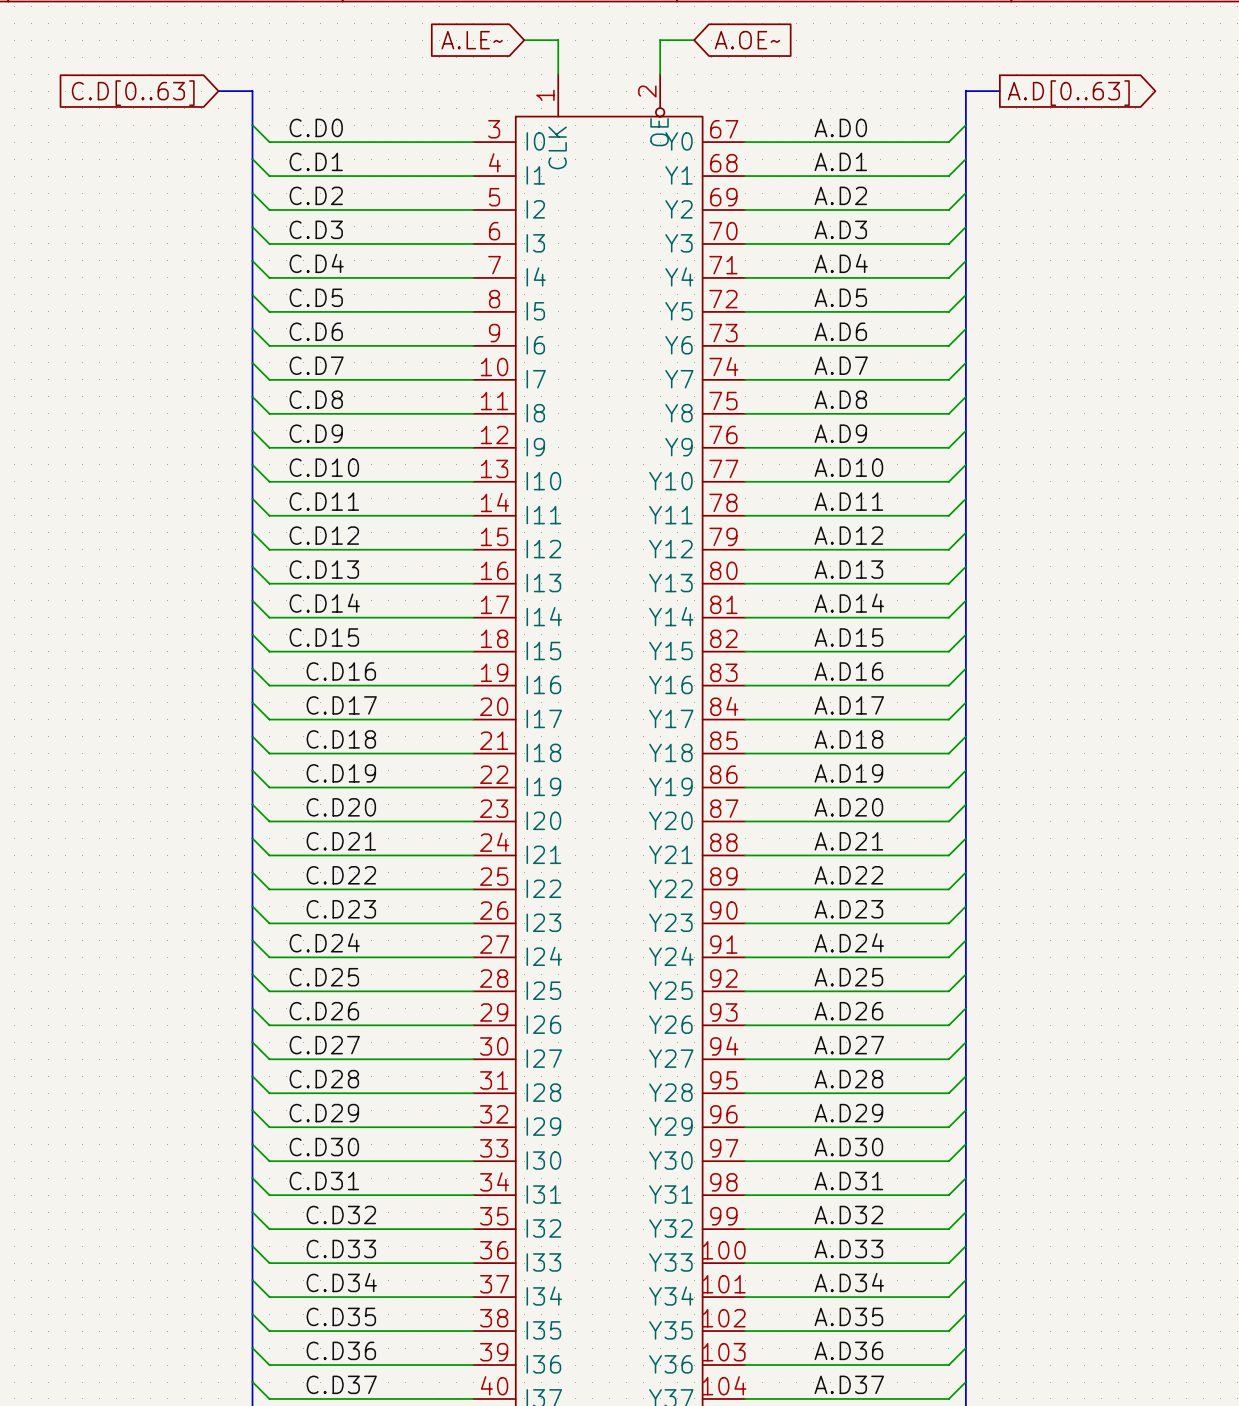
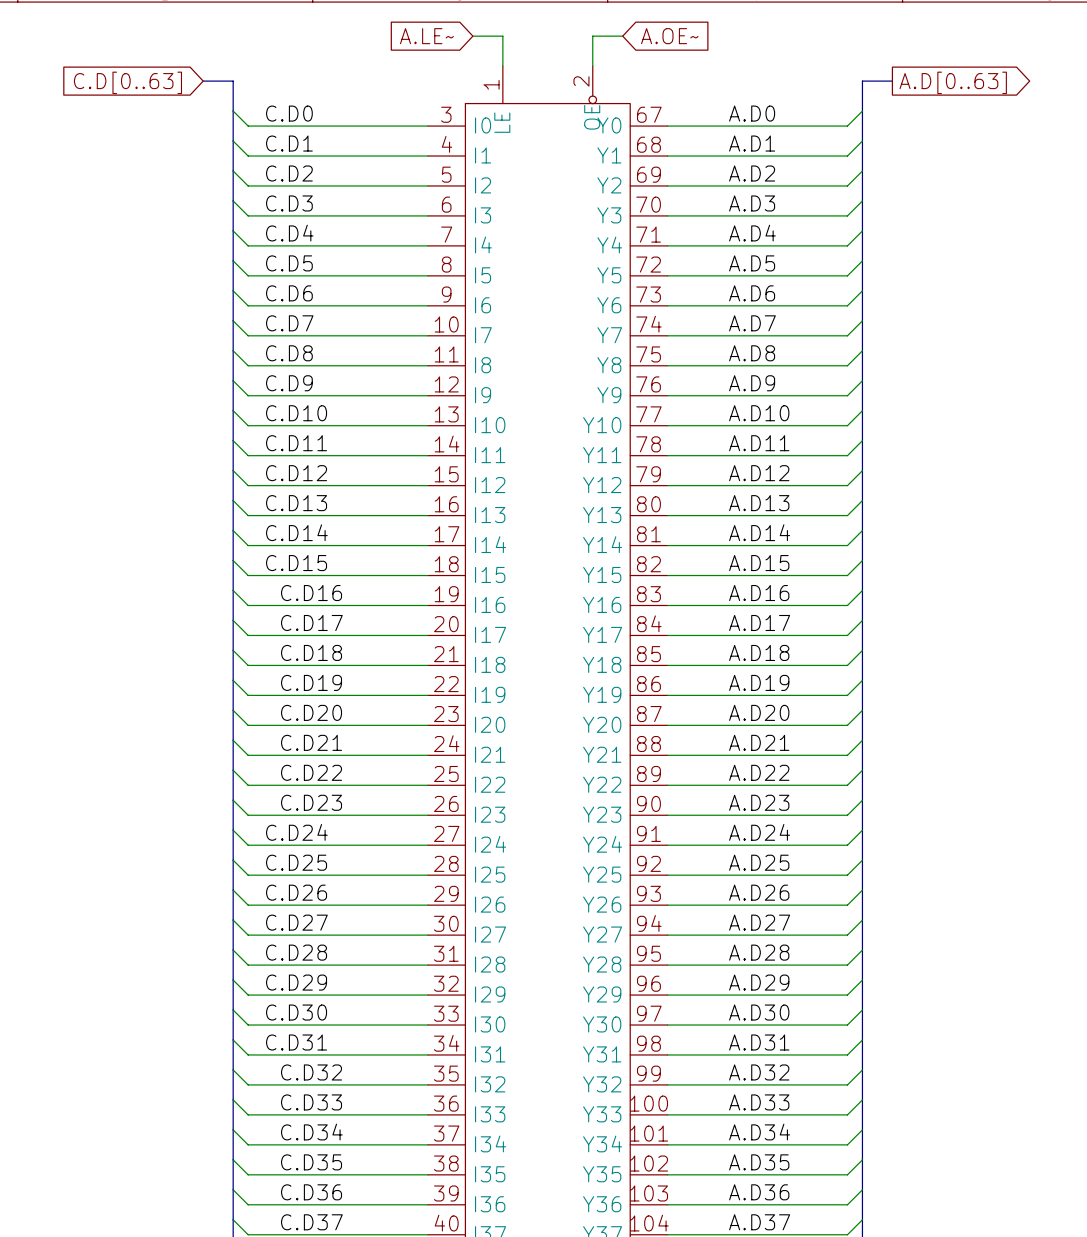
part pin name: CLK (557, 147) -> LE (502, 122)

